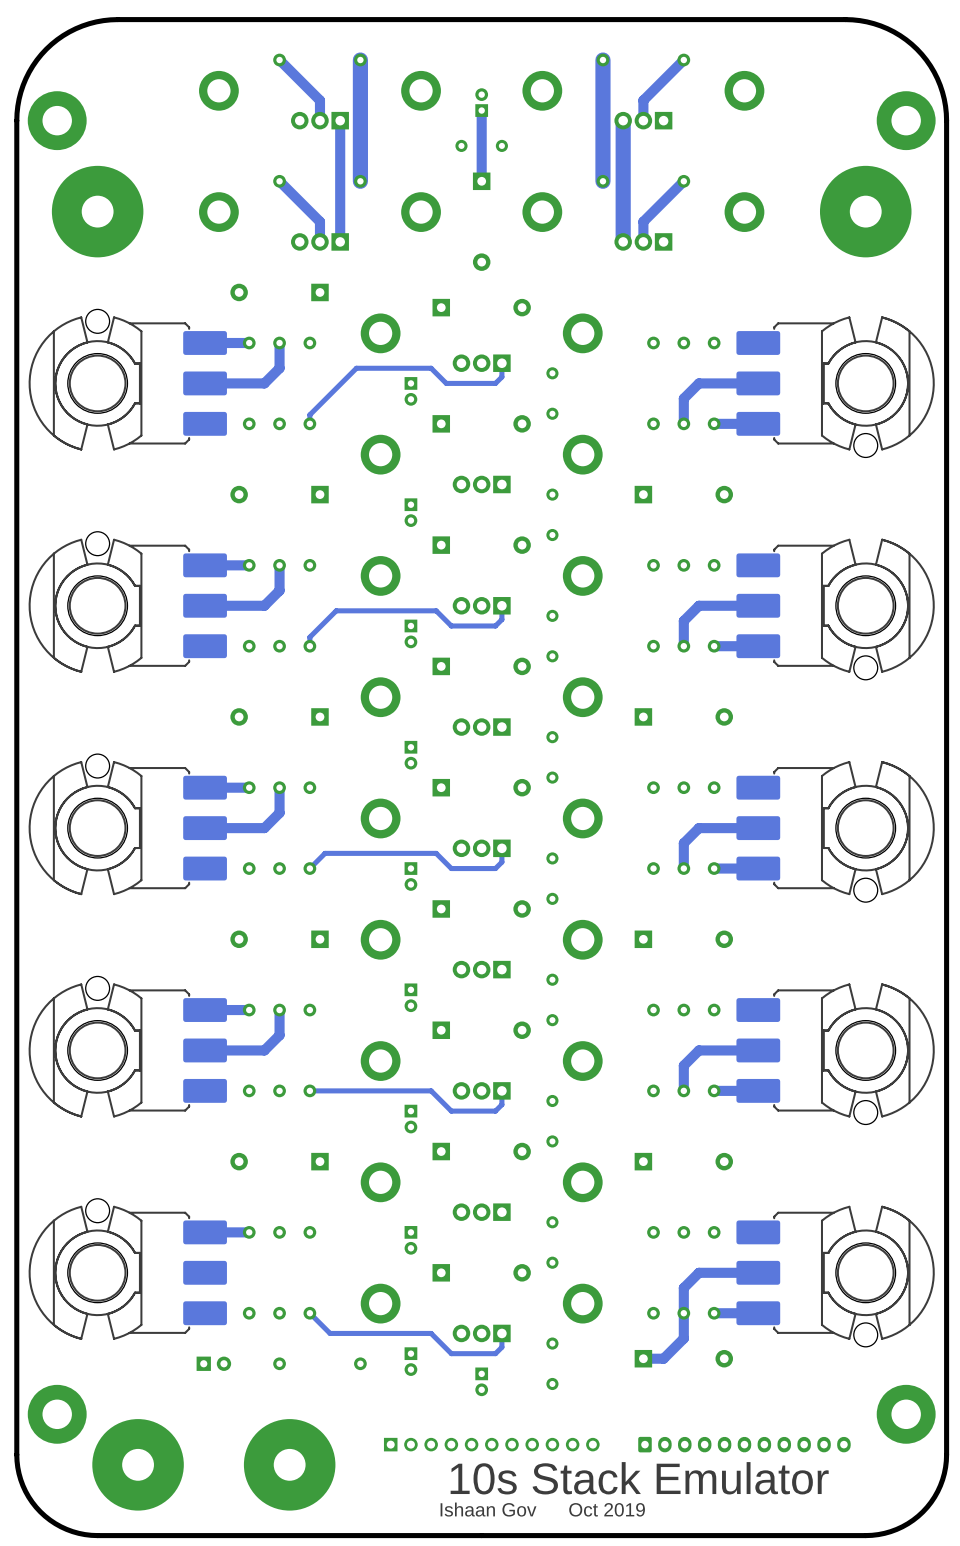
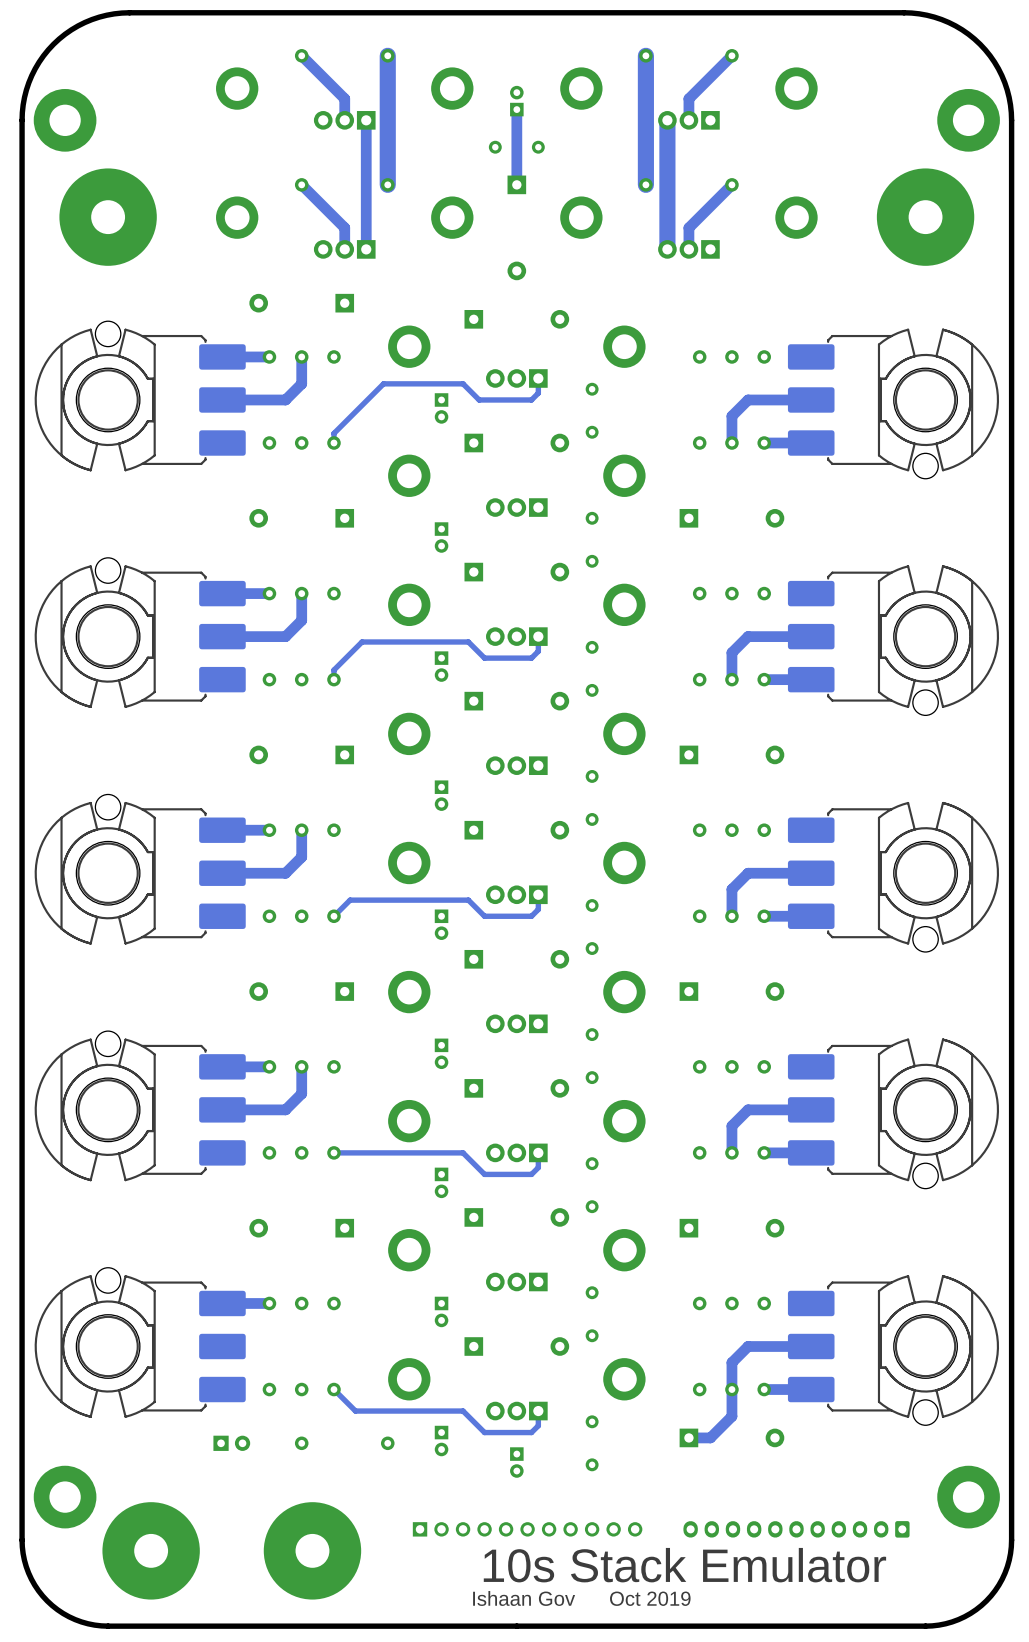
part rotation: 0° (744, 1444) -> 180° (796, 1529)

